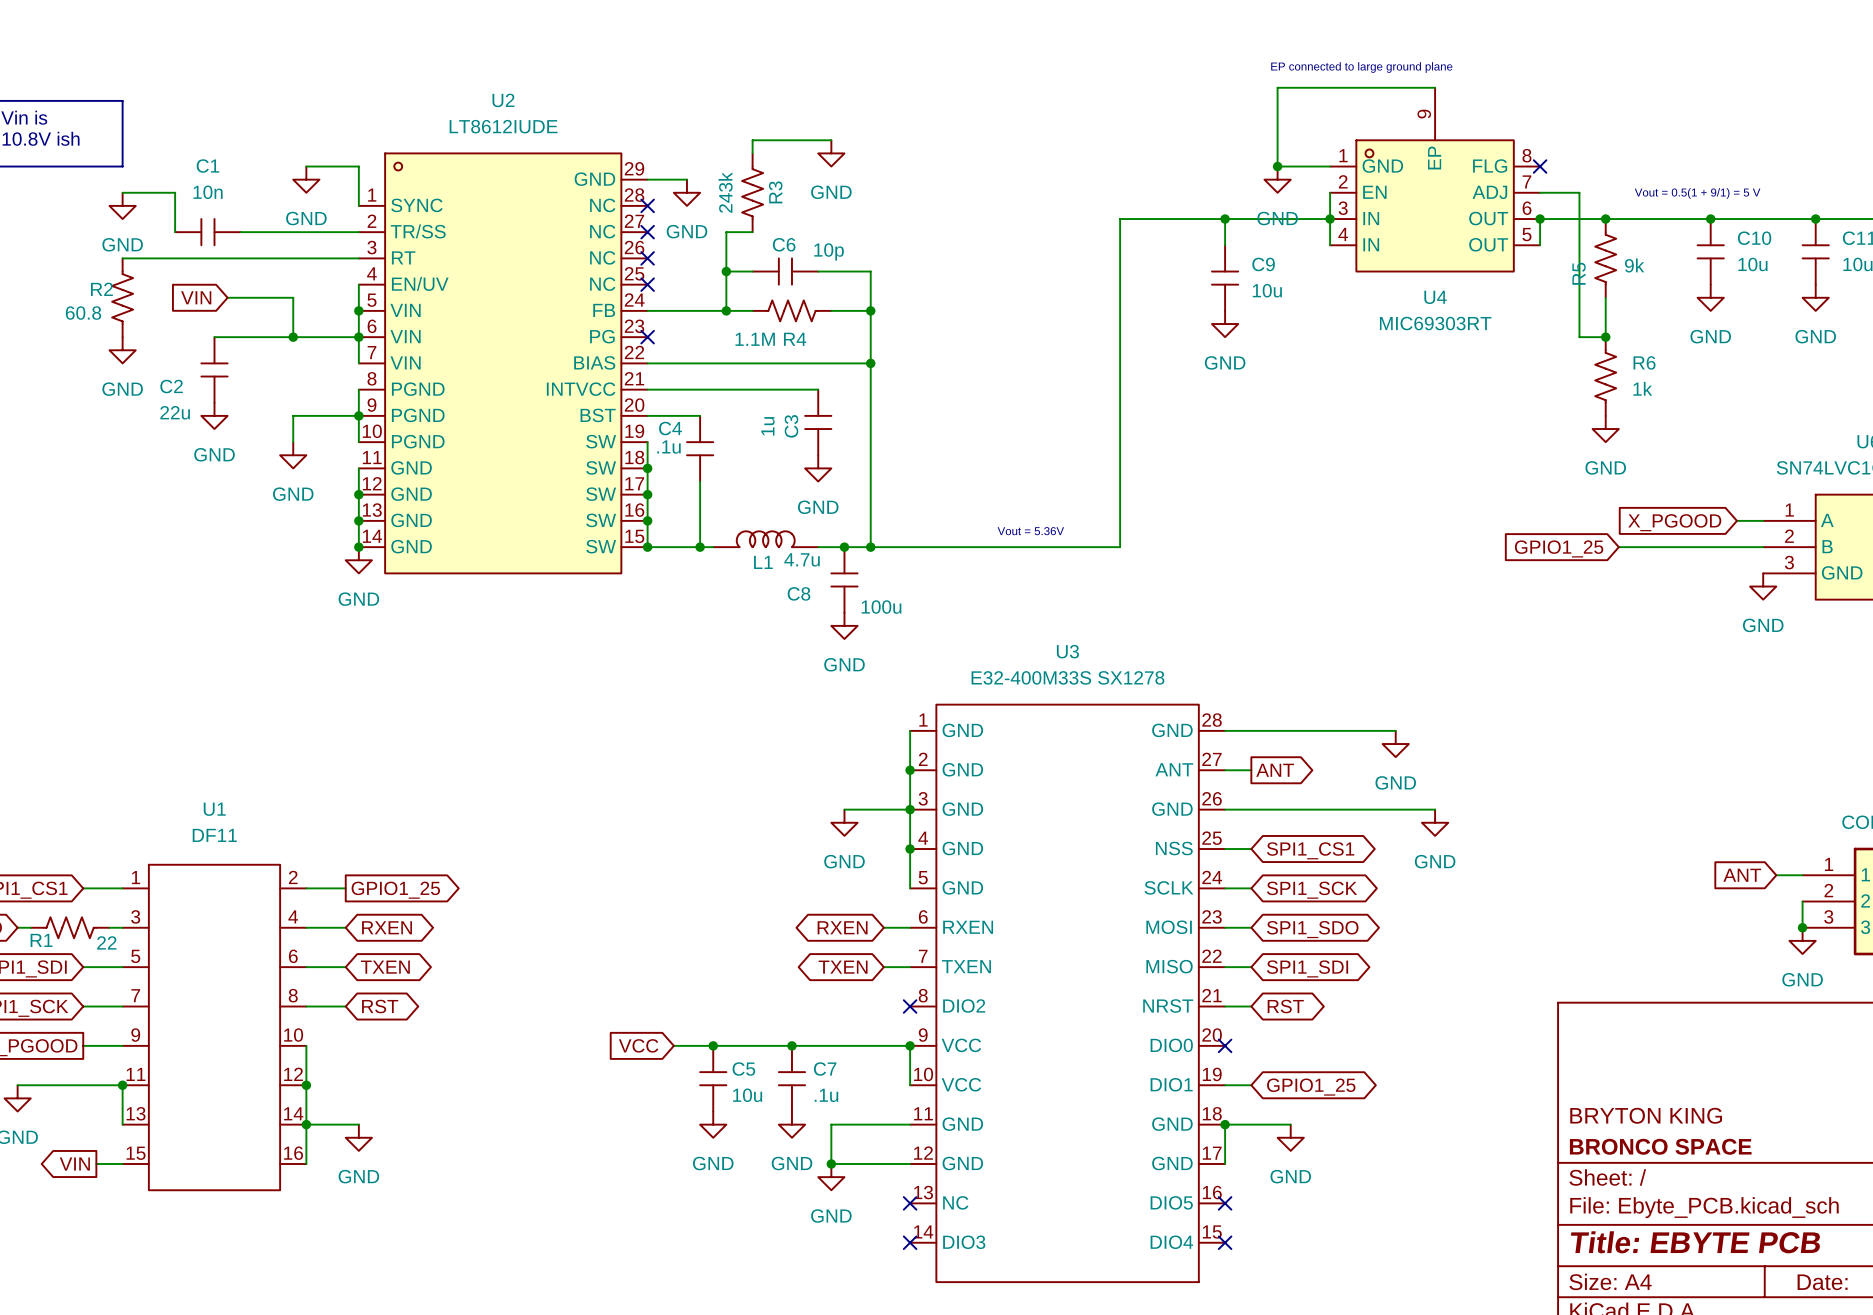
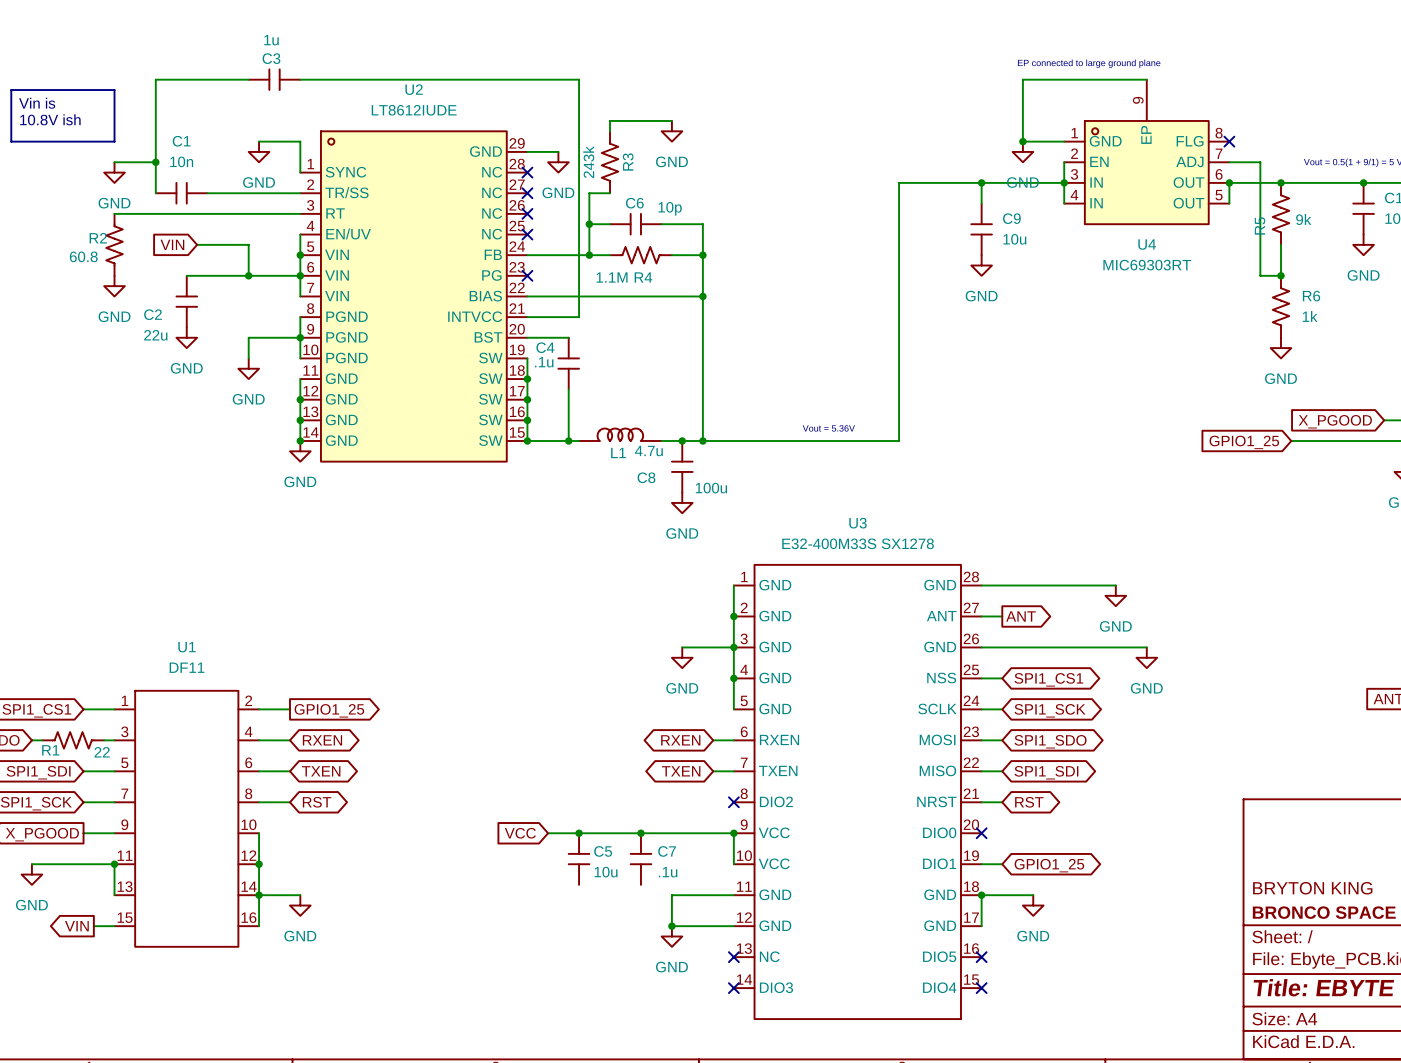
wire: none -> (248, 79) (155, 79) (155, 162)
junction: none -> (155, 162)
wire: (713, 389) (818, 389) -> (579, 317) (579, 79) (300, 79)
C3 rotation: 0° (818, 422) -> 90° clockwise (274, 79)
C3 position: (818, 422) -> (274, 79)
power symbol: GND (818, 468) -> none
power symbol: GND (713, 1124) -> none
power symbol: GND (791, 1124) -> none

